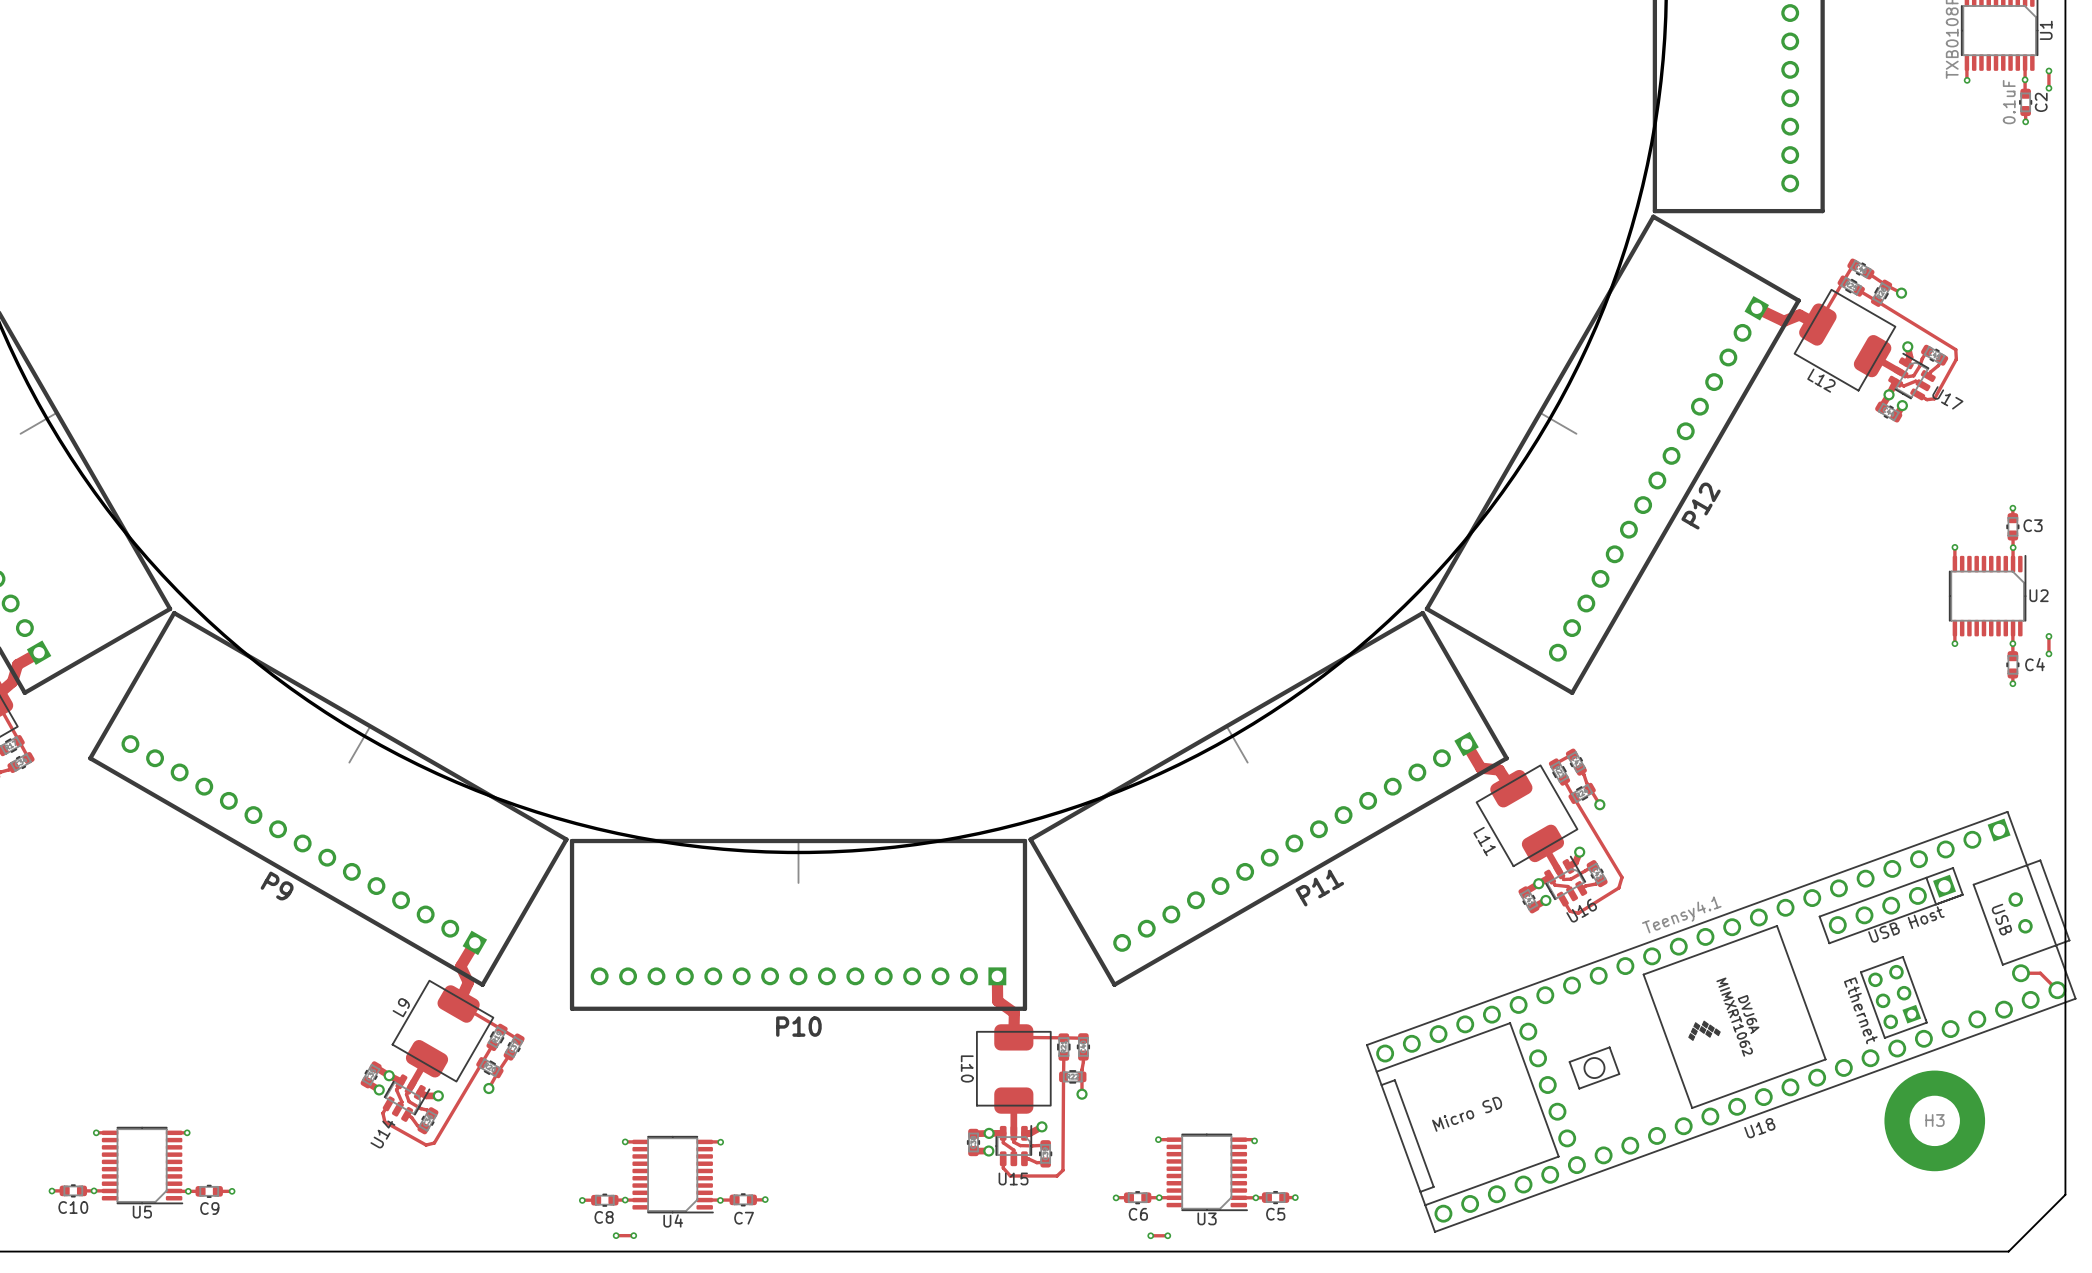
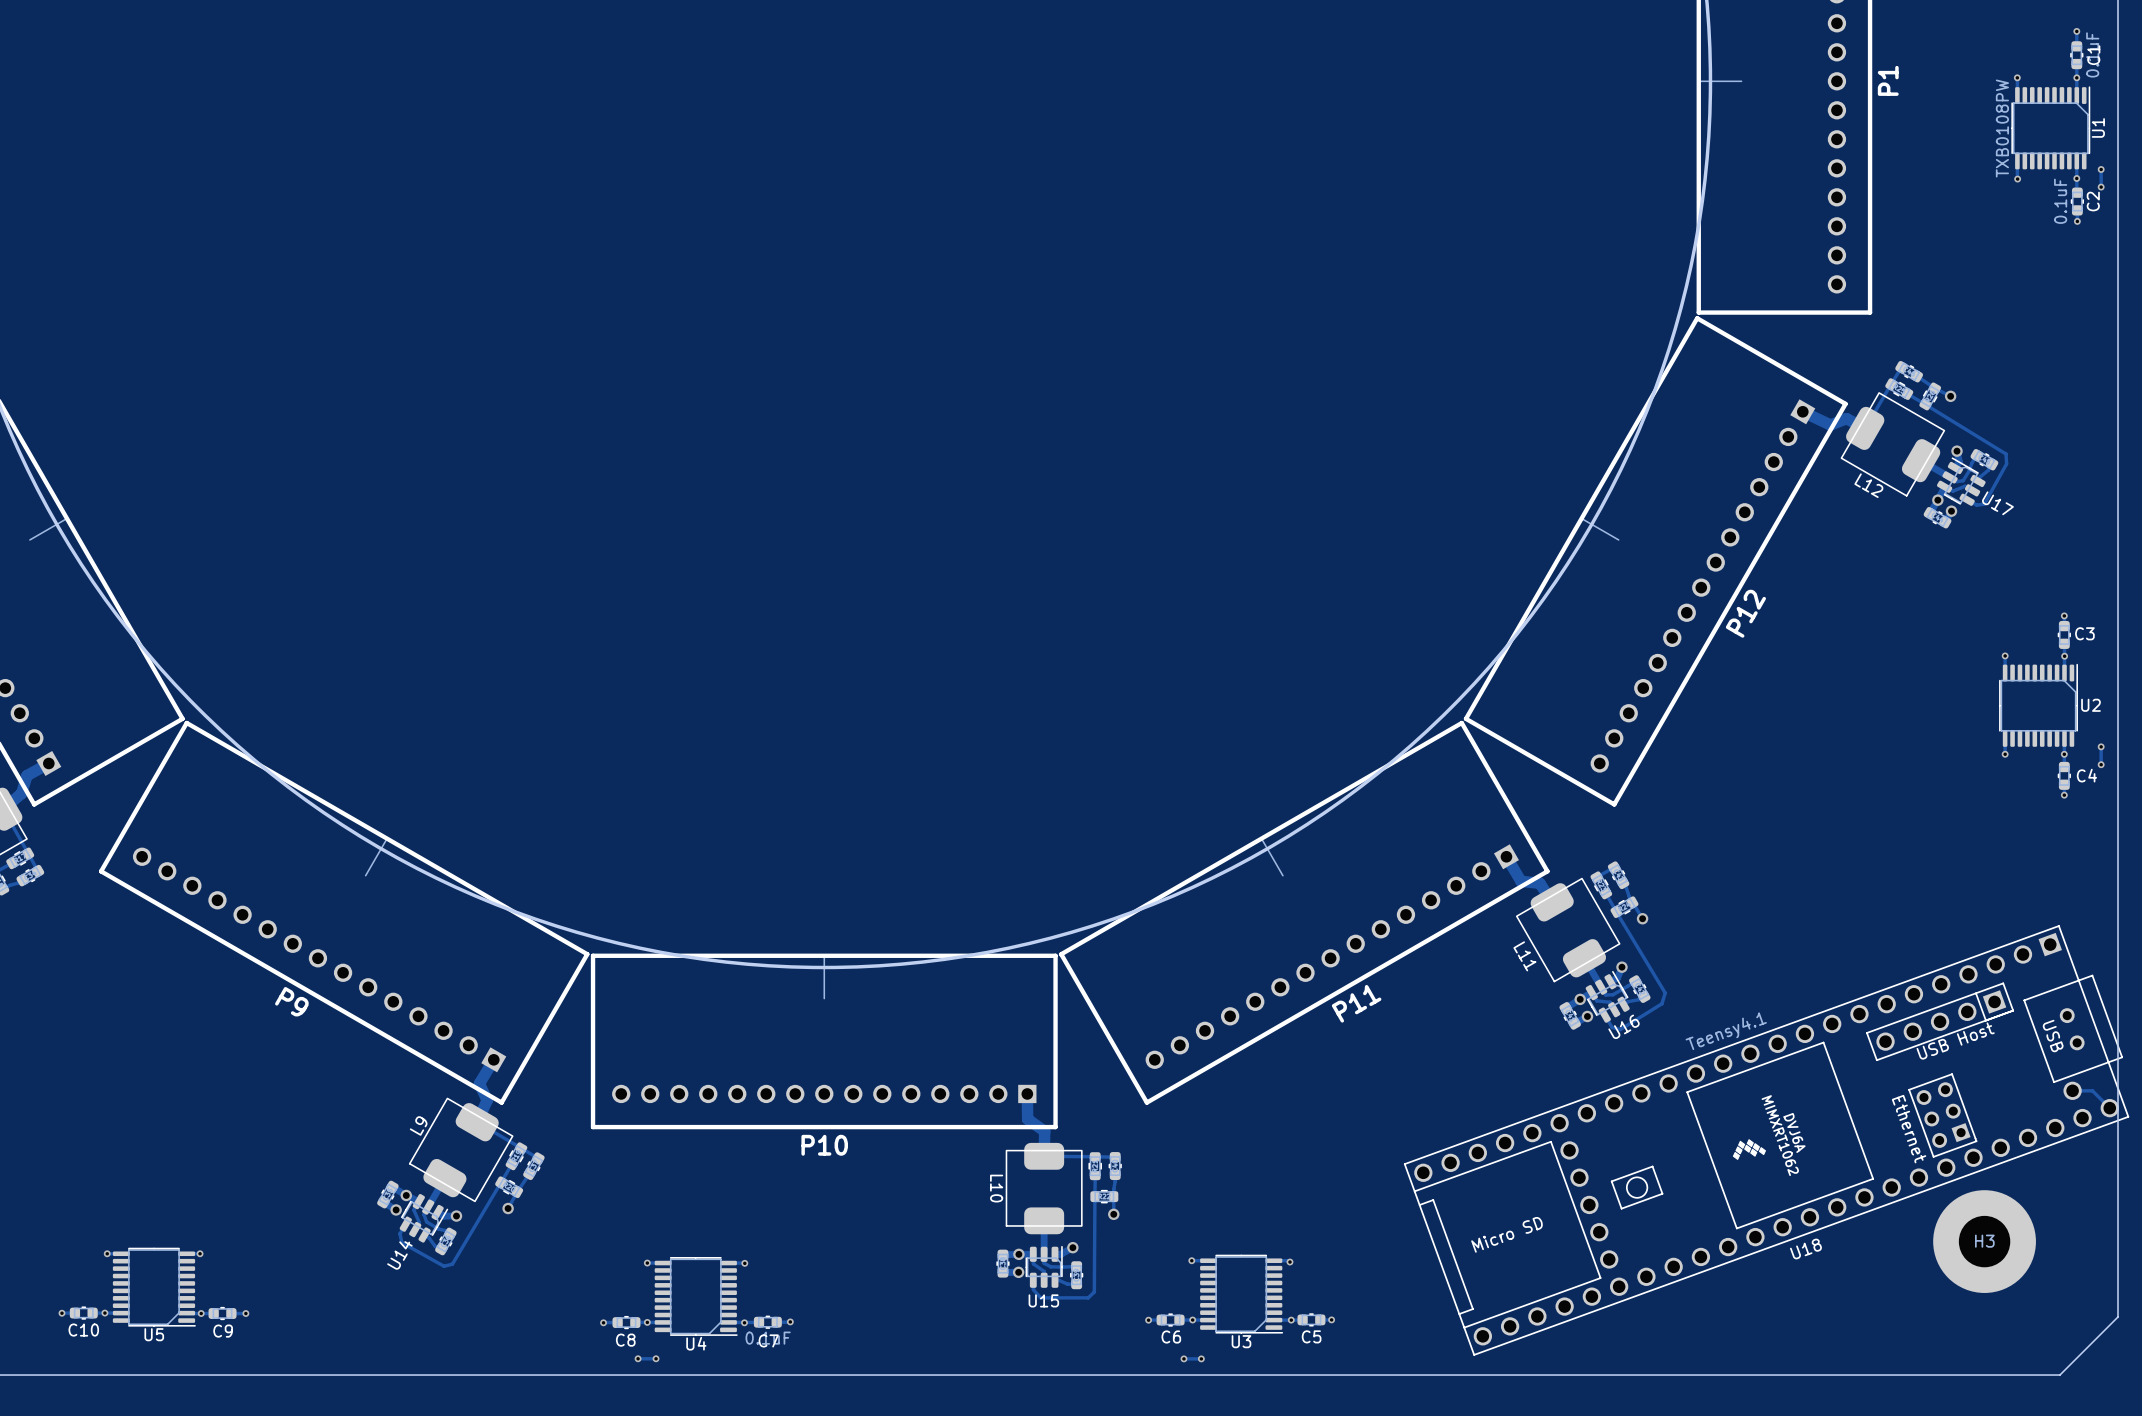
C7 value: none -> 0.1uF (768, 1338)

